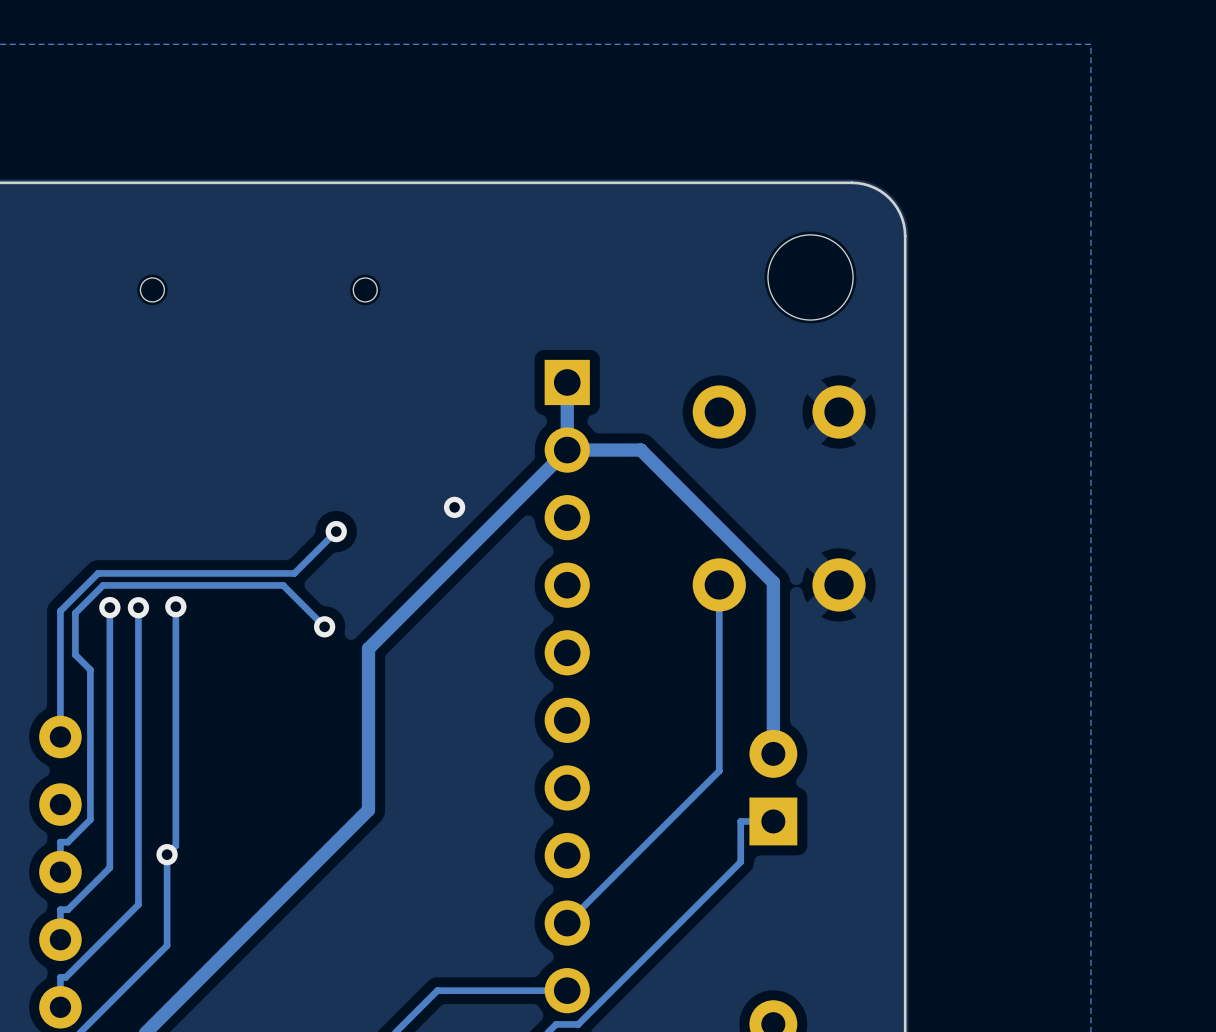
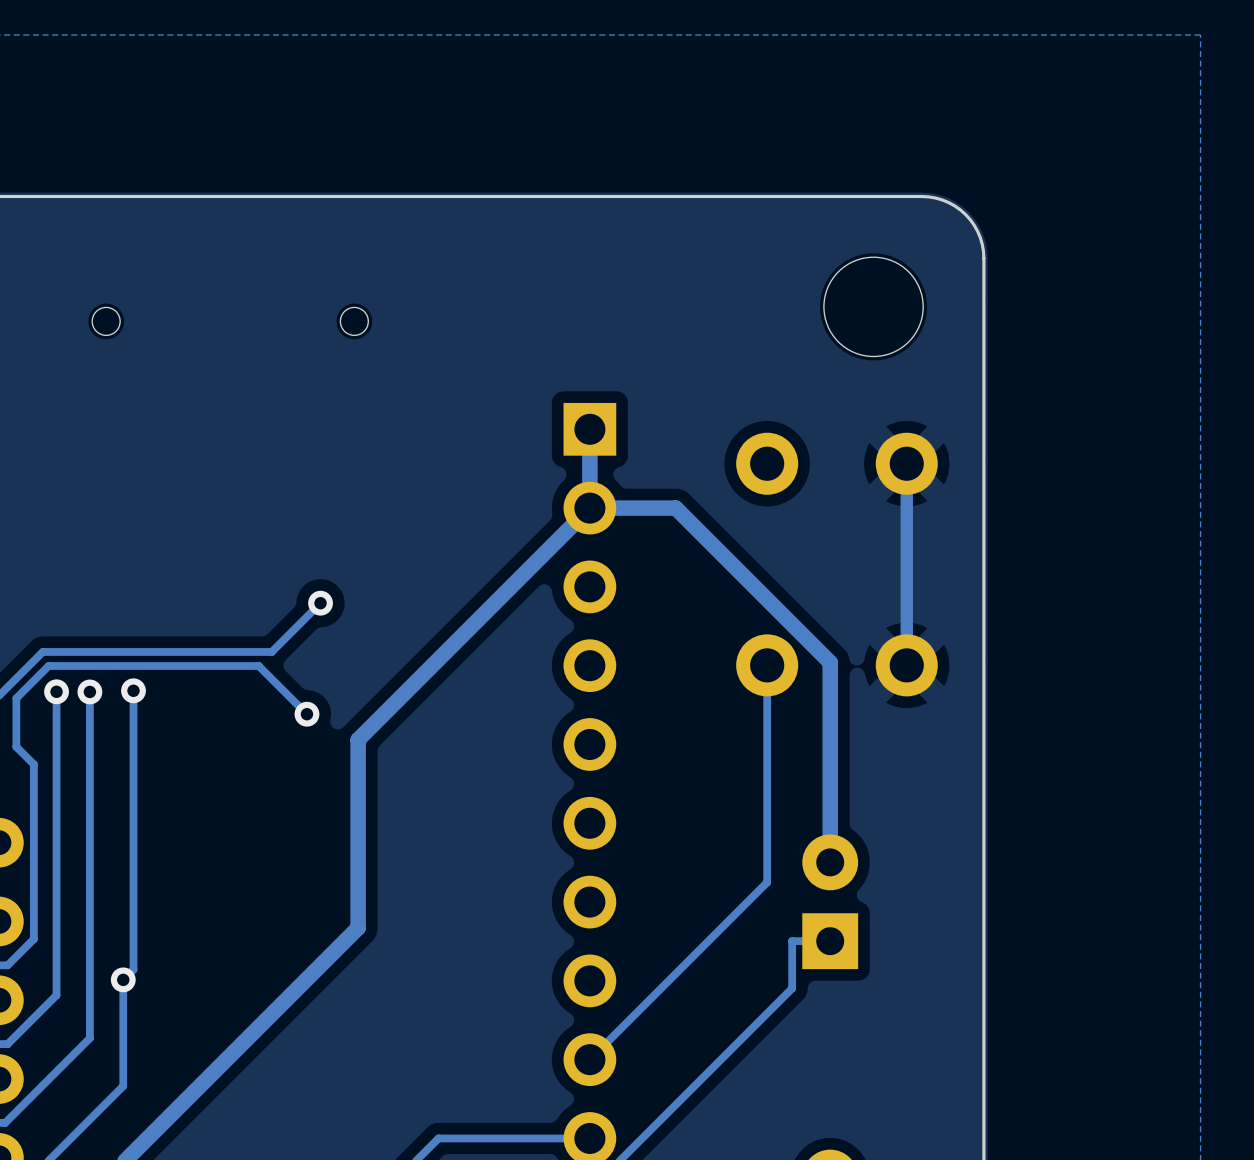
track: none -> (906, 463) (906, 665)
via: (454, 507) -> none

